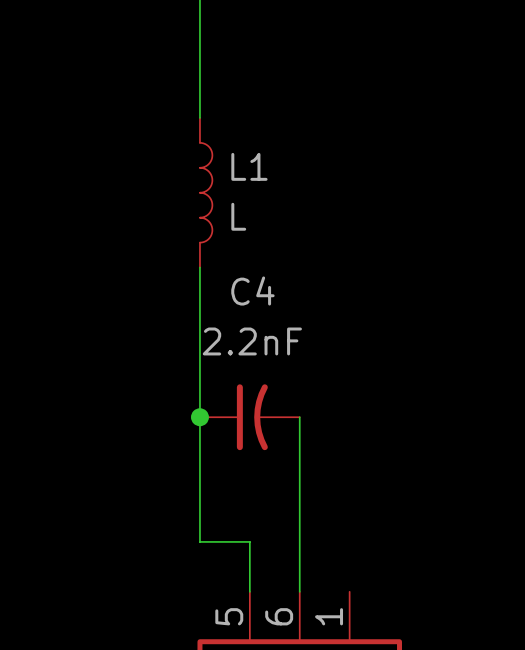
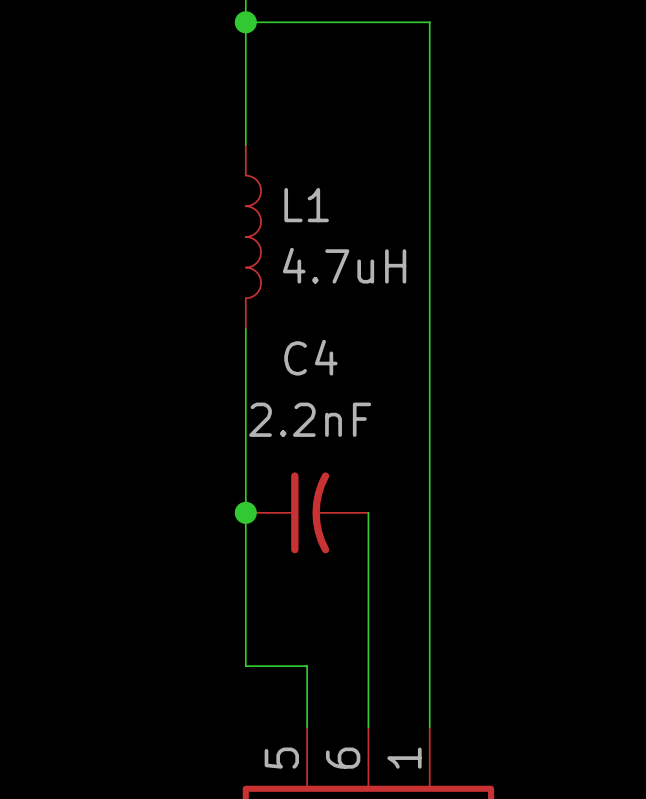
wire: none -> (245, 22) (429, 22) (429, 727)
junction: none -> (245, 22)
L1 value: L (238, 216) -> 4.7uH (344, 265)

